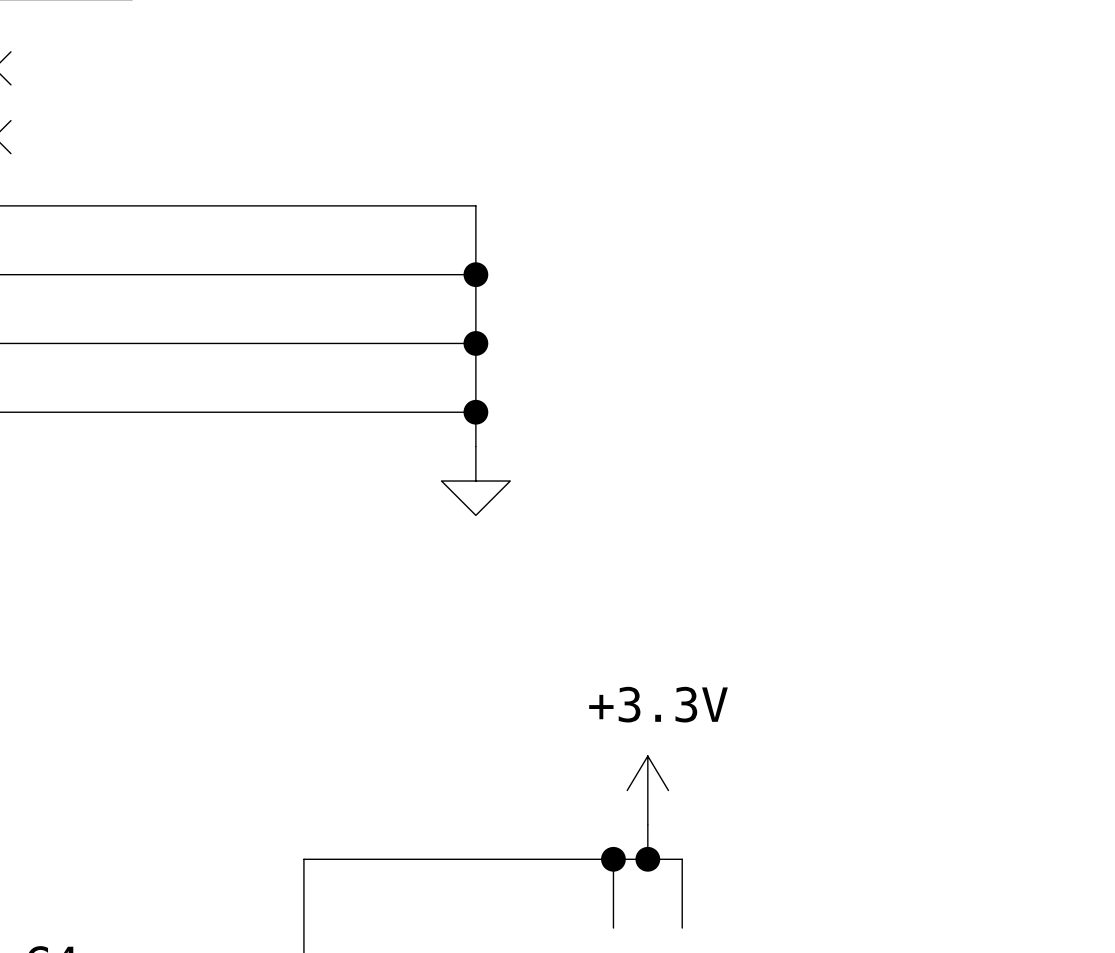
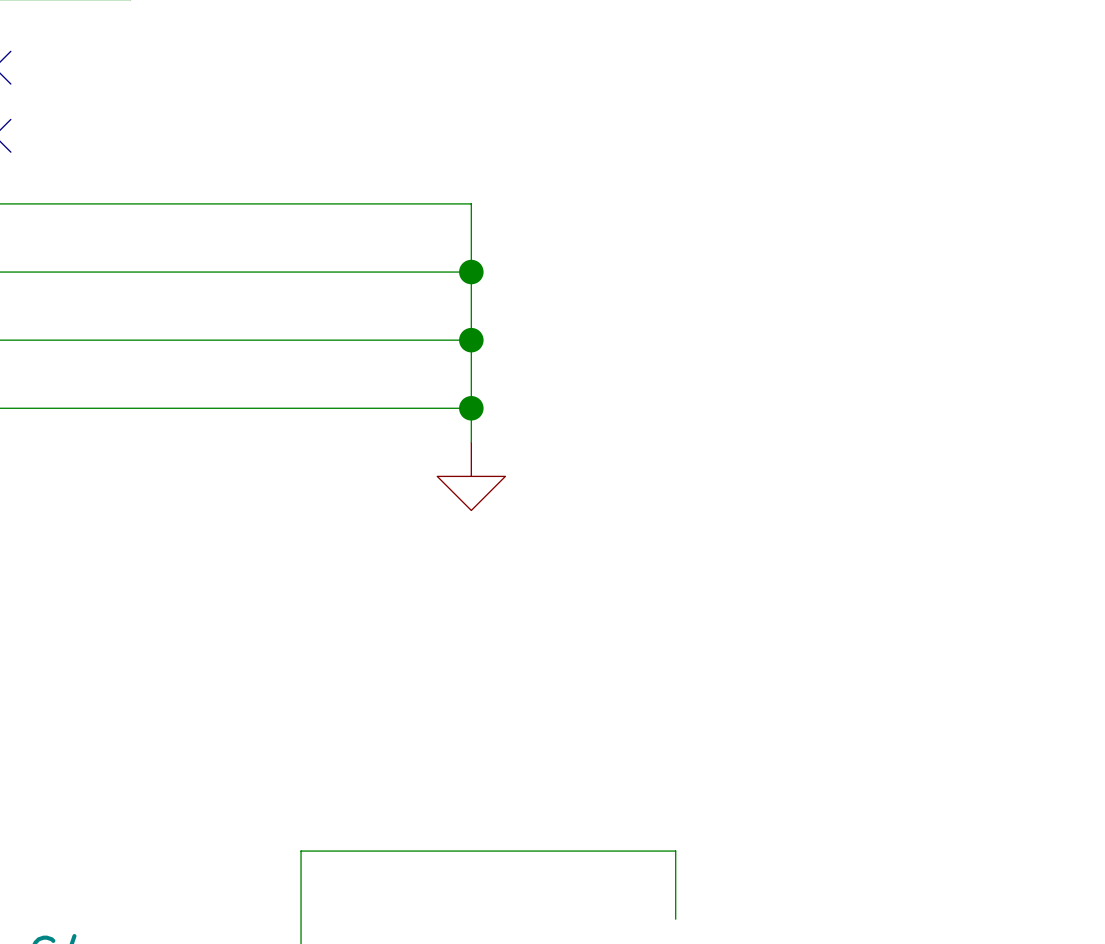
power symbol: +3.3V (647, 790) -> none
wire: (647, 824) (647, 859) -> none
wire: (613, 859) (613, 928) -> none
junction: (613, 859) -> none
junction: (647, 859) -> none

